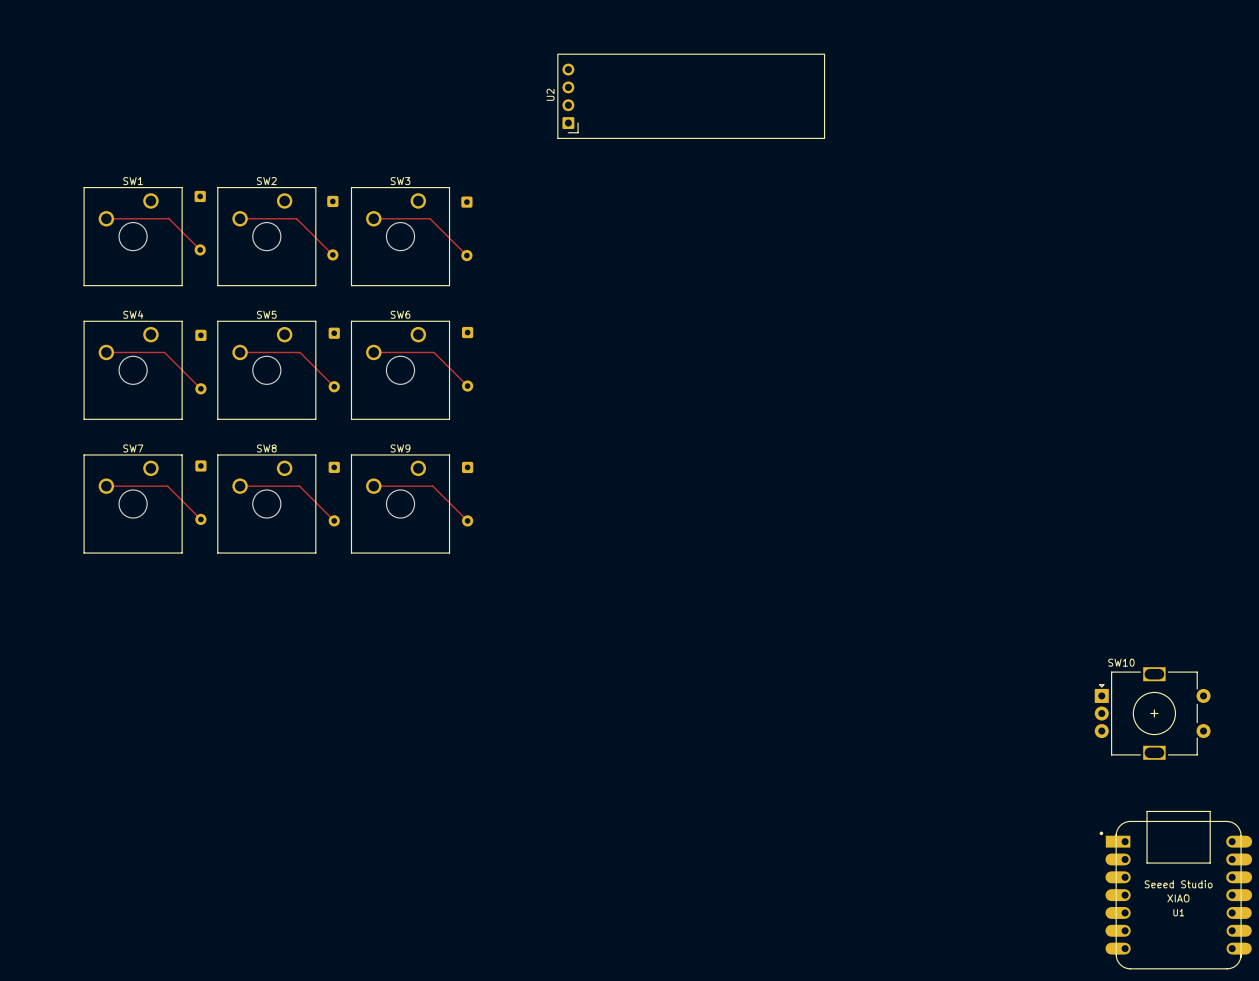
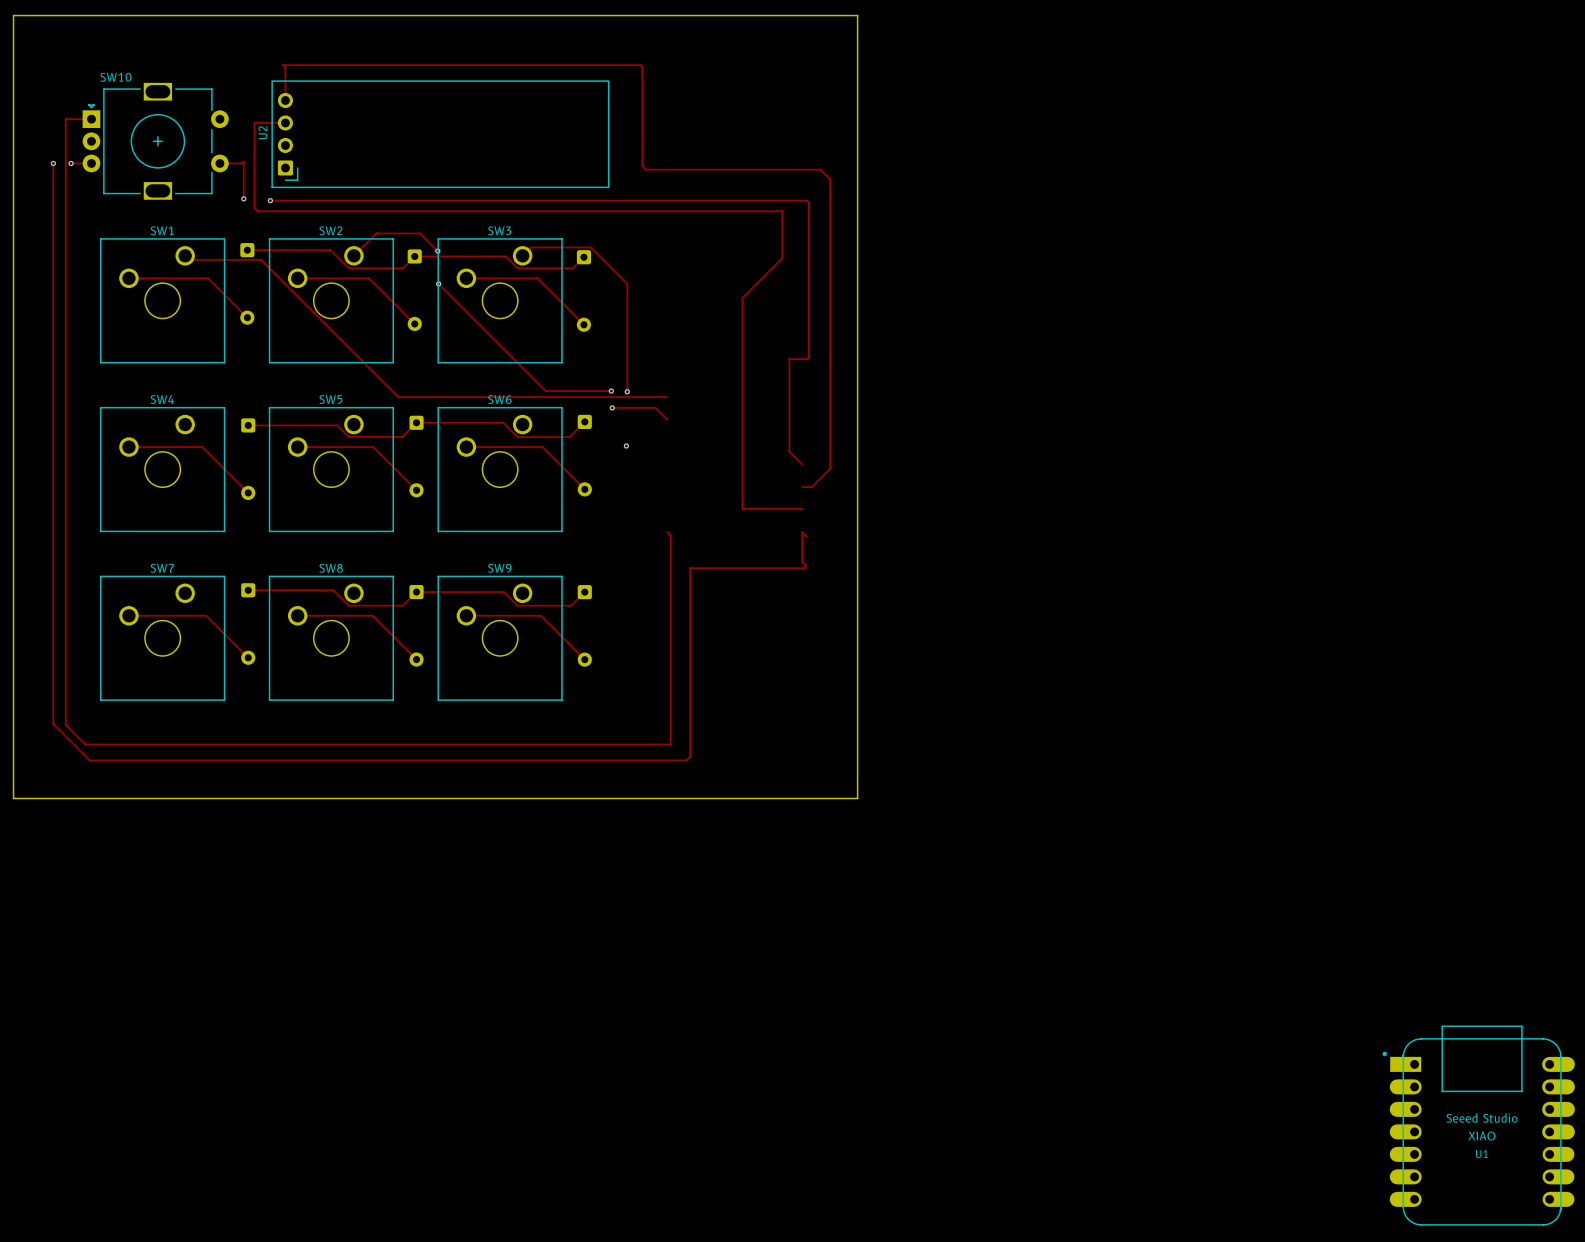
board edge: none -> (13, 15) (857, 15) (857, 798) (13, 798) (13, 15)
track: none -> (285, 100) (285, 67) (282, 65) (640, 65) (642, 66) (642, 166) (645, 169) (820, 169) (830, 179) (830, 468) (811, 487) (802, 487)
track: none -> (91, 119) (65, 119) (65, 724) (85, 744) (670, 744) (670, 535) (667, 532)
track: none -> (285, 122) (254, 123) (254, 207) (257, 211) (782, 211) (782, 258) (742, 298) (742, 508) (802, 509)
U2 position: (691, 96) -> (440, 134)
track: none -> (53, 163) (53, 724) (89, 760) (686, 760) (690, 756) (690, 568) (803, 568) (806, 565) (802, 561) (802, 532) (807, 536)
via: none -> (53, 163)
track: none -> (71, 163) (91, 163)
via: none -> (71, 163)
track: none -> (219, 163) (242, 163) (243, 161) (243, 198)
via: none -> (243, 198)
track: none -> (270, 200) (807, 200) (808, 202) (808, 357) (807, 359) (789, 359) (789, 451) (802, 464)
via: none -> (270, 200)
track: none -> (247, 250) (330, 250) (348, 268) (402, 268) (414, 256) (505, 256) (517, 268) (572, 268) (583, 257)
track: none -> (437, 251) (420, 233) (376, 233) (353, 255)
via: none -> (437, 251)
track: none -> (185, 255) (189, 259) (261, 259) (398, 397) (667, 397)
track: none -> (522, 255) (530, 247) (590, 247) (627, 283) (627, 391)
track: none -> (438, 283) (545, 391) (611, 391)
via: none -> (438, 283)
via: none -> (611, 391)
via: none -> (627, 391)
track: none -> (612, 407) (655, 407) (667, 419)
via: none -> (612, 407)
track: none -> (584, 421) (569, 437) (517, 437) (503, 422) (416, 422) (402, 436) (348, 436) (337, 425) (248, 425)
via: none -> (626, 445)
track: none -> (248, 590) (333, 590) (348, 605) (402, 605) (416, 592) (503, 592) (517, 605) (571, 605) (584, 592)
SW10 position: (1152, 713) -> (155, 141)

